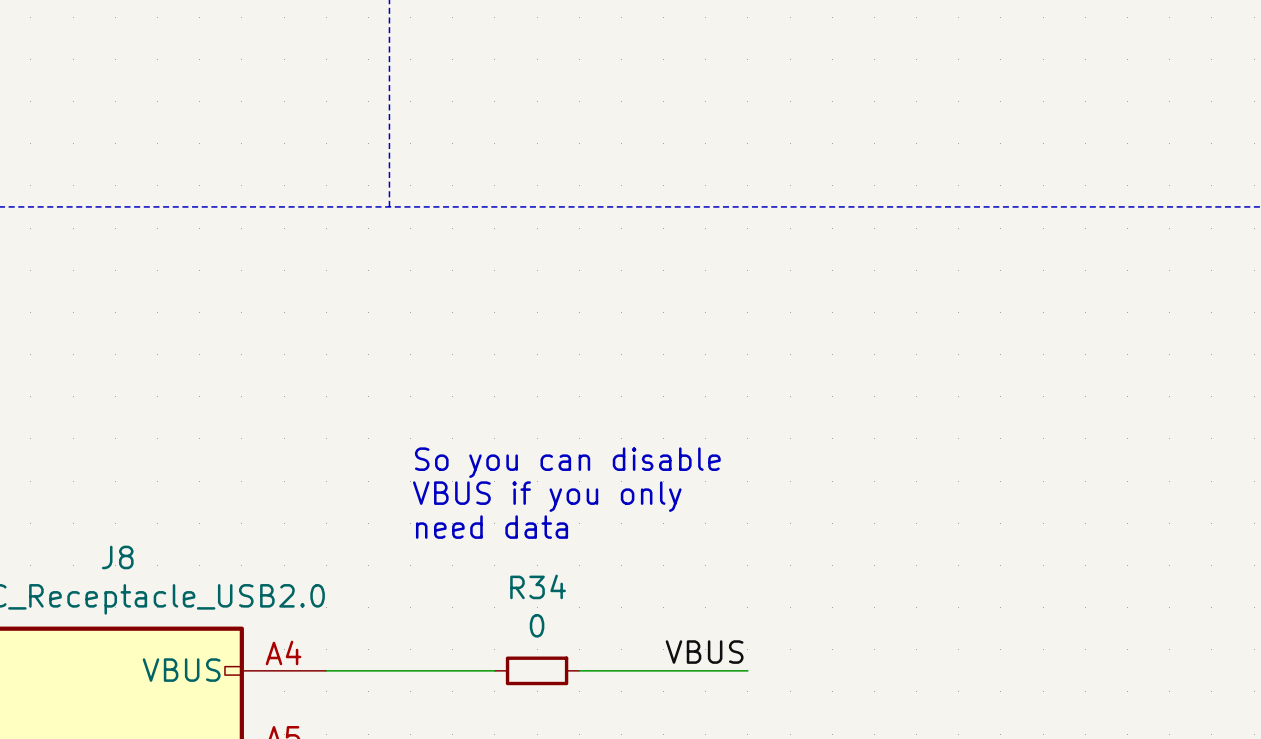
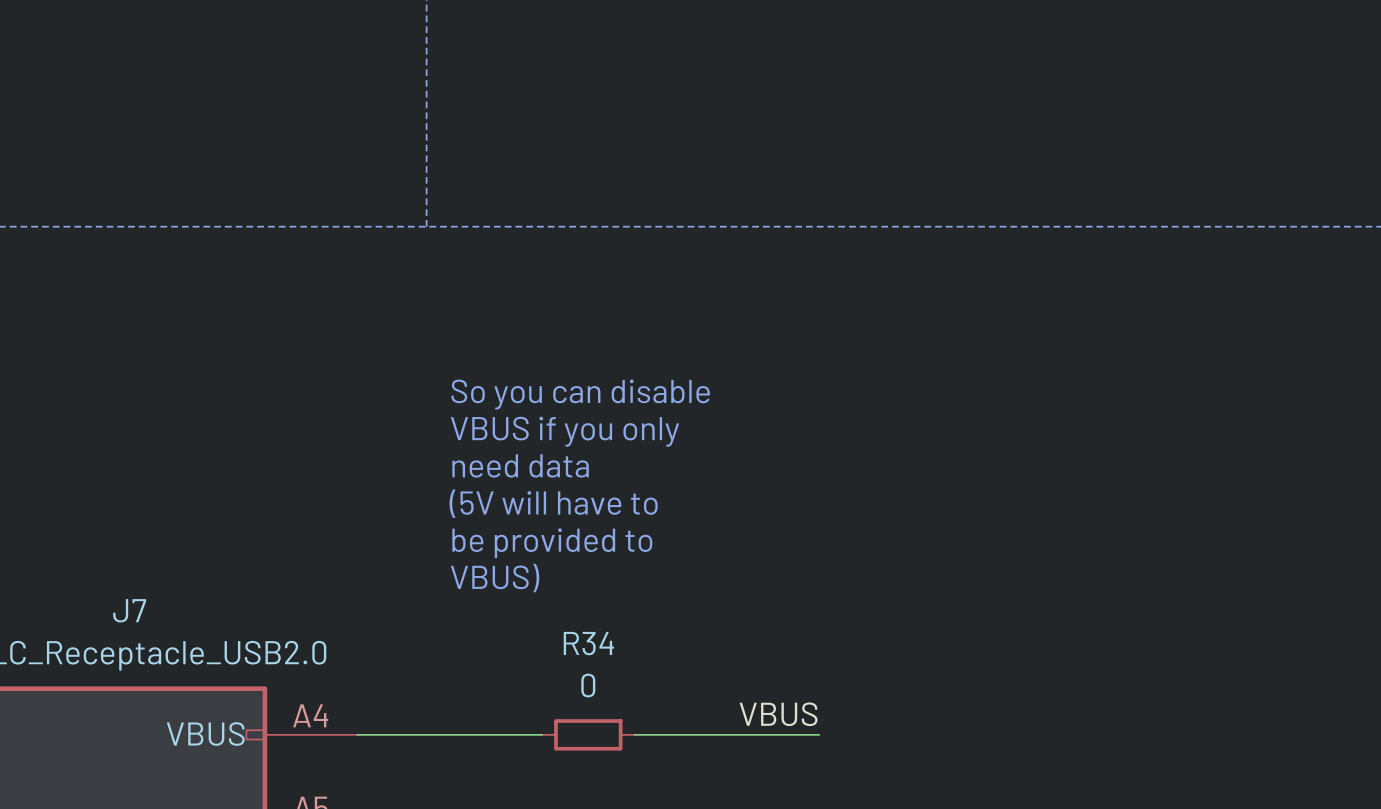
text: none -> So you can disable (580, 394)
text: none -> VBUS if you only (565, 431)
text: none -> need data (520, 465)
text: So you can disable (567, 462) -> (5V will have to (553, 503)
text: VBUS if you only (547, 496) -> be provided to (552, 543)
text: need data (492, 527) -> VBUS) (495, 578)
J8 name: J8 (117, 557) -> J7 (129, 610)

